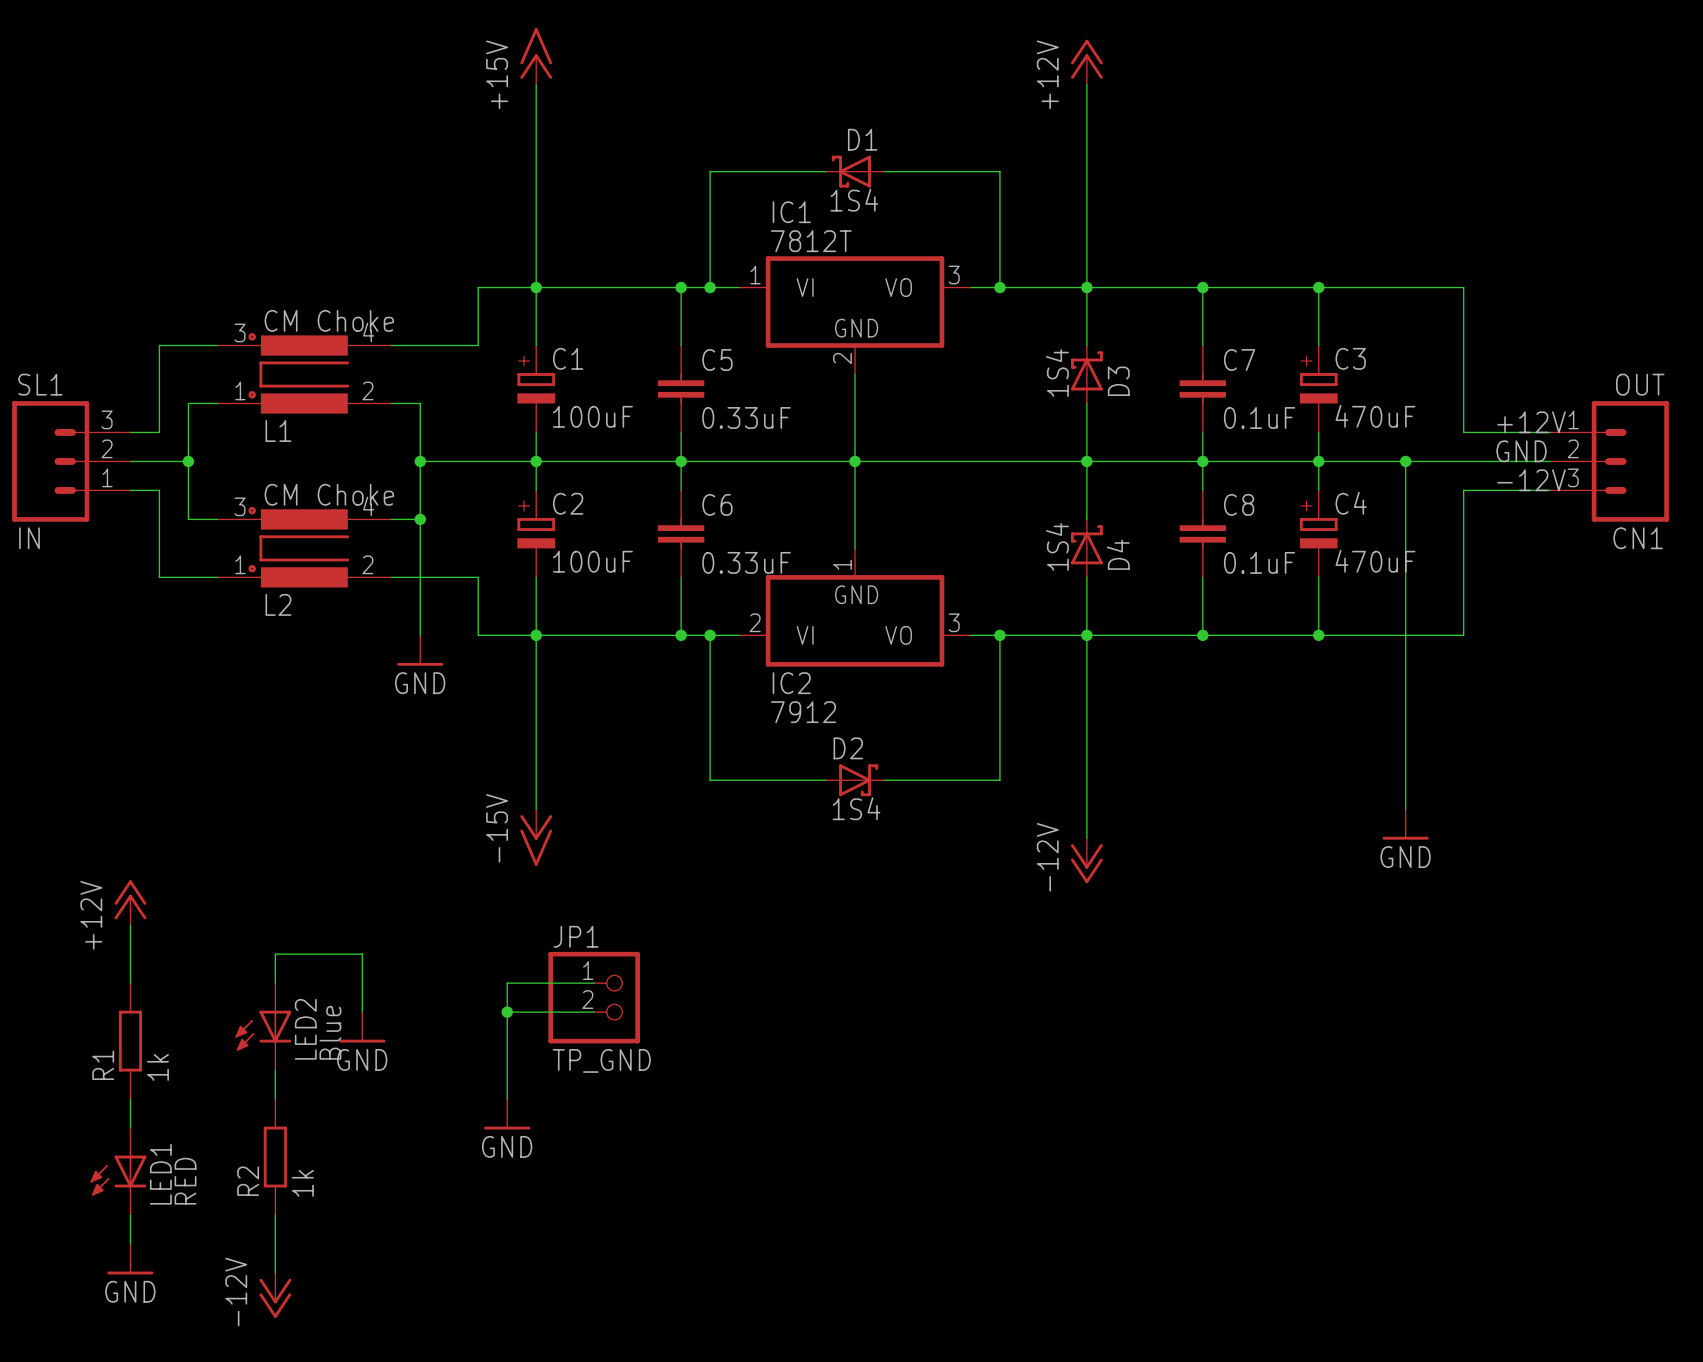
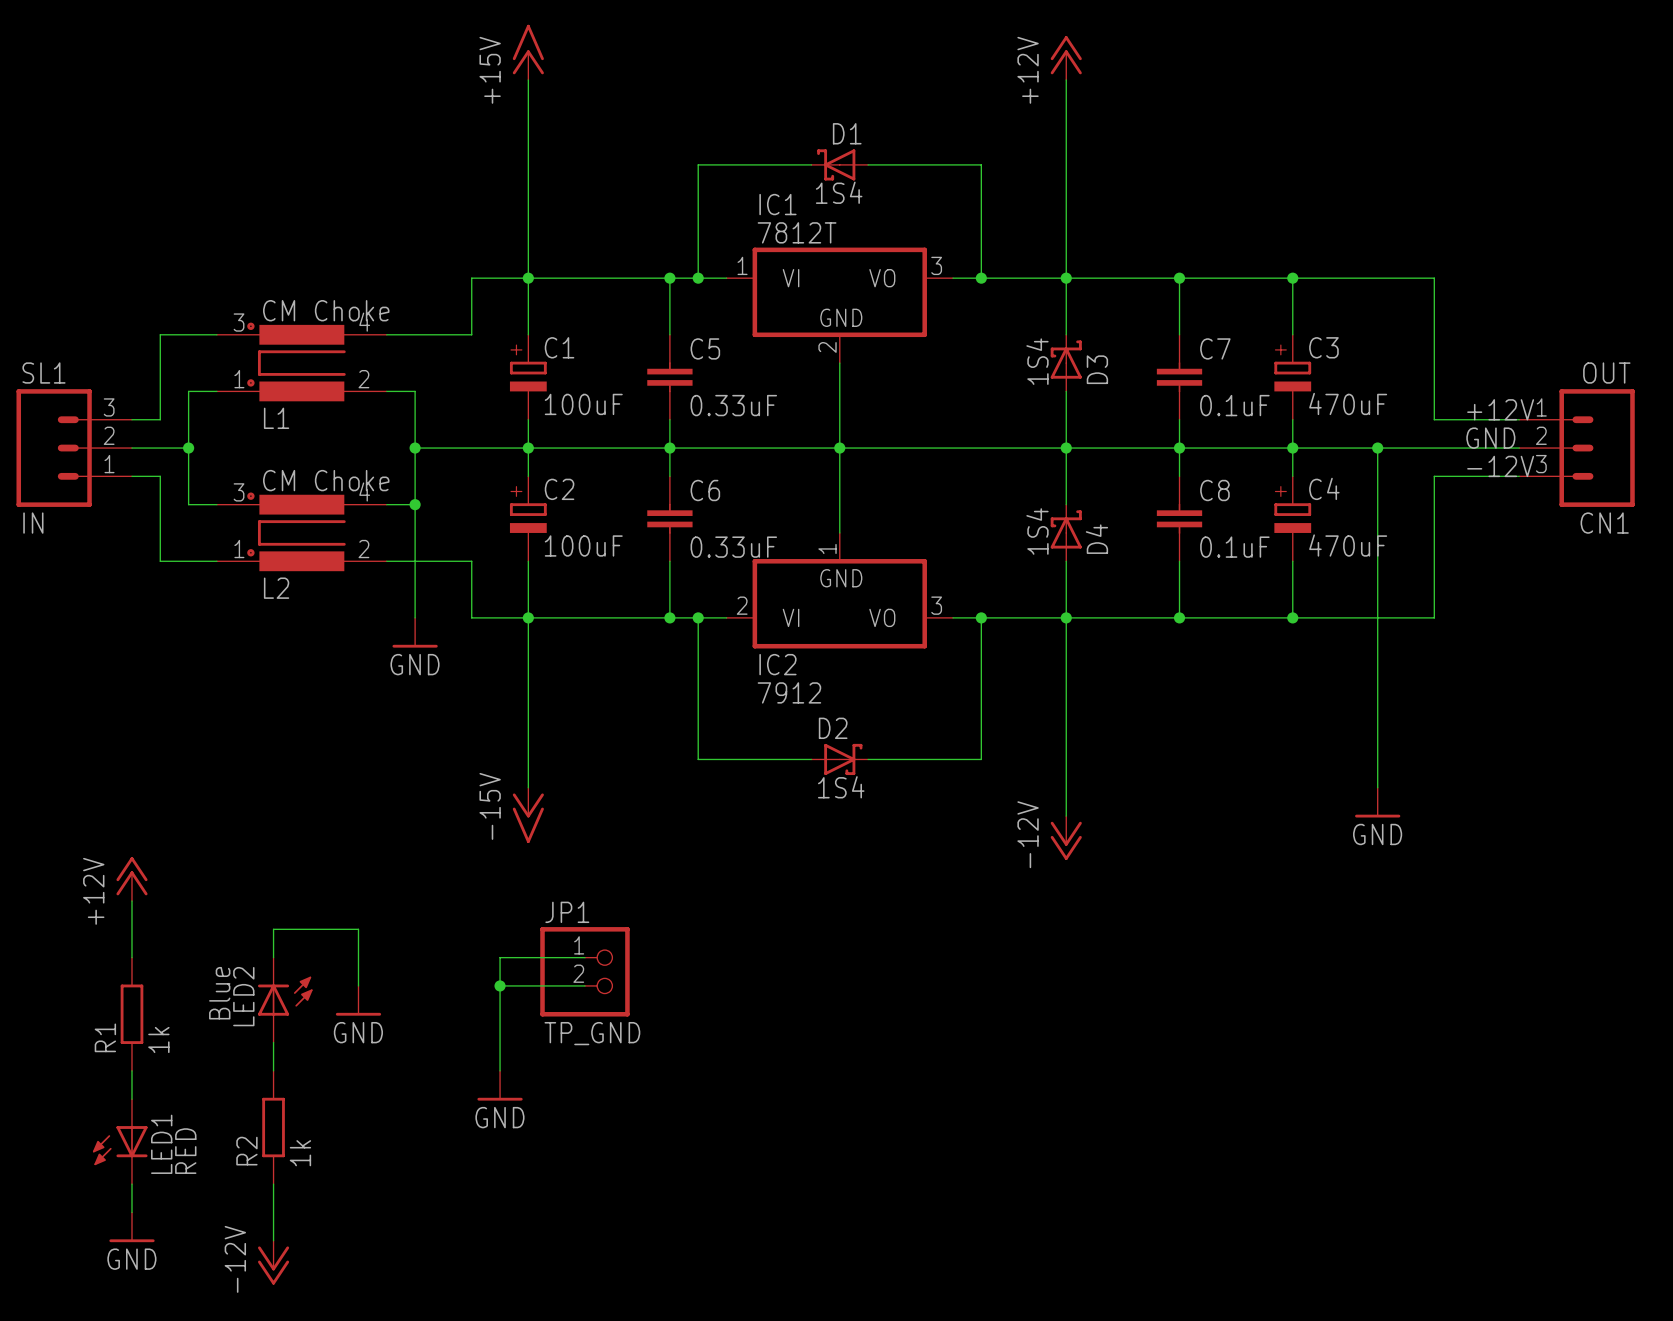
LED2 rotation: 0° (263, 1030) -> 180° (285, 996)

